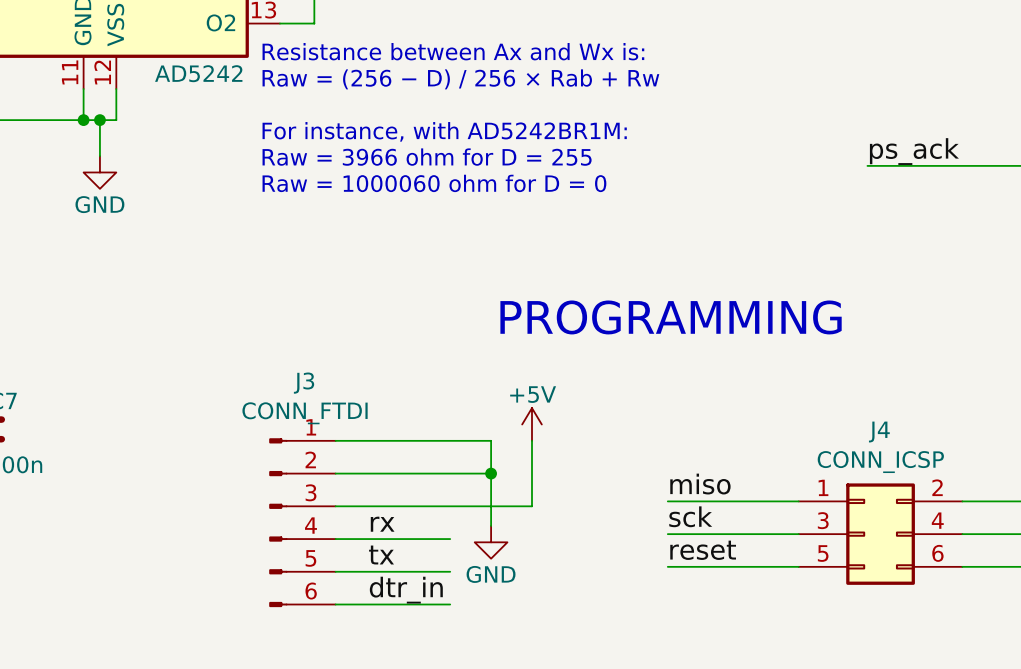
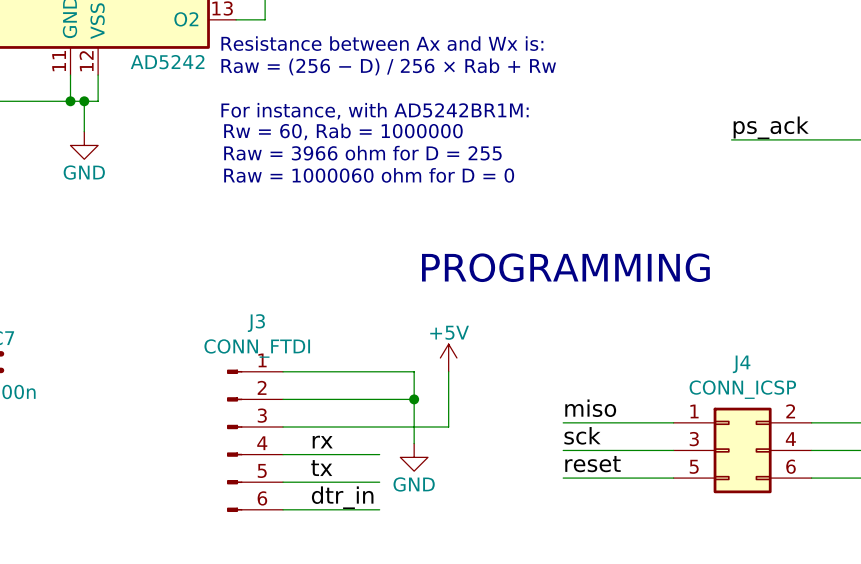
text: Raw = 3966 ohm for D = 255 (427, 157) -> Rw = 60, Rab = 1000000 (343, 131)
text: Raw = 1000060 ohm for D = 0 (434, 183) -> Raw = 3966 ohm for D = 255 (362, 153)
text: none -> Raw = 1000060 ohm for D = 0 (369, 175)

